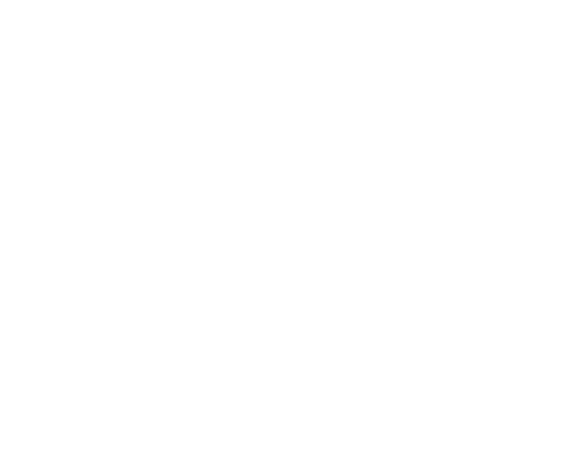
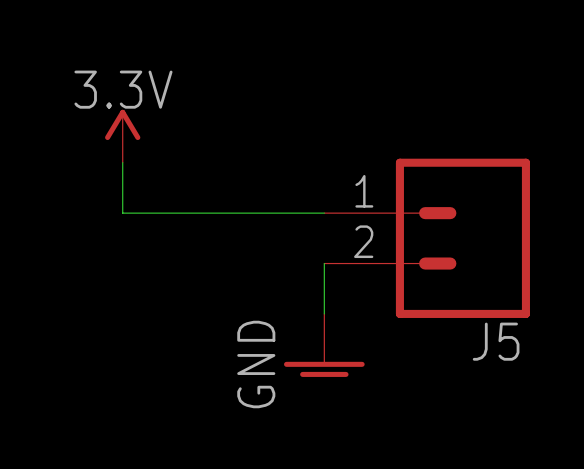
power symbol: none -> 3.3V (122, 136)
wire: none -> (122, 162) (122, 213) (324, 213)
J5: none -> (427, 238)
wire: none -> (324, 263) (324, 313)
power symbol: none -> GND (324, 345)

